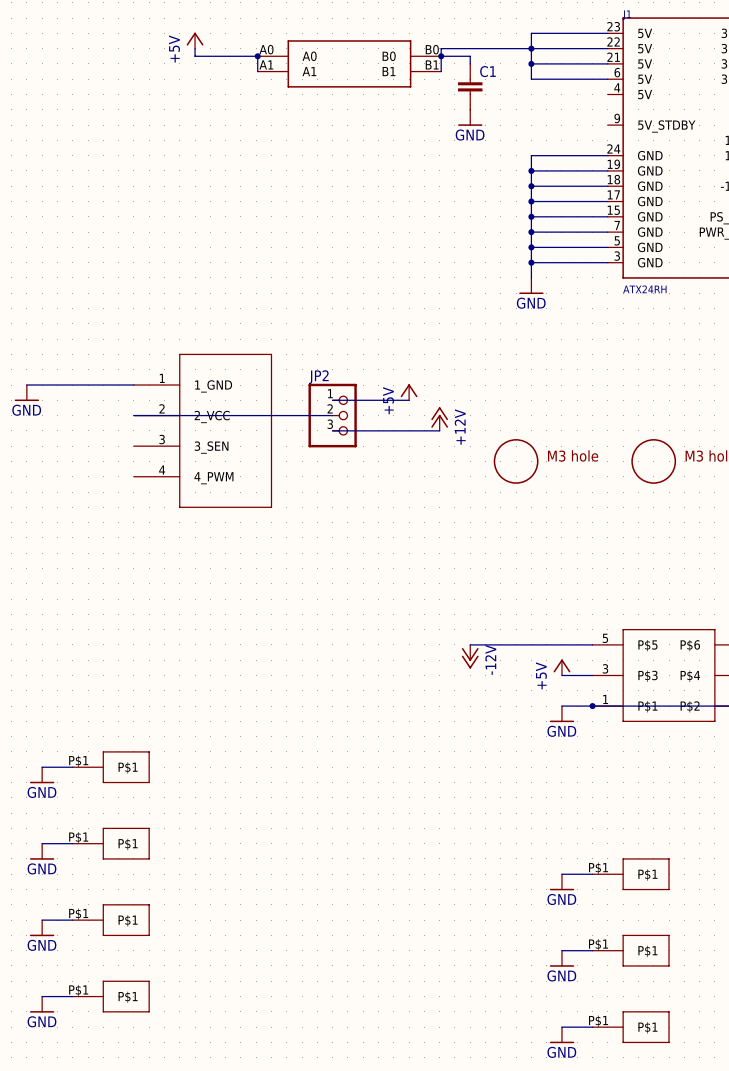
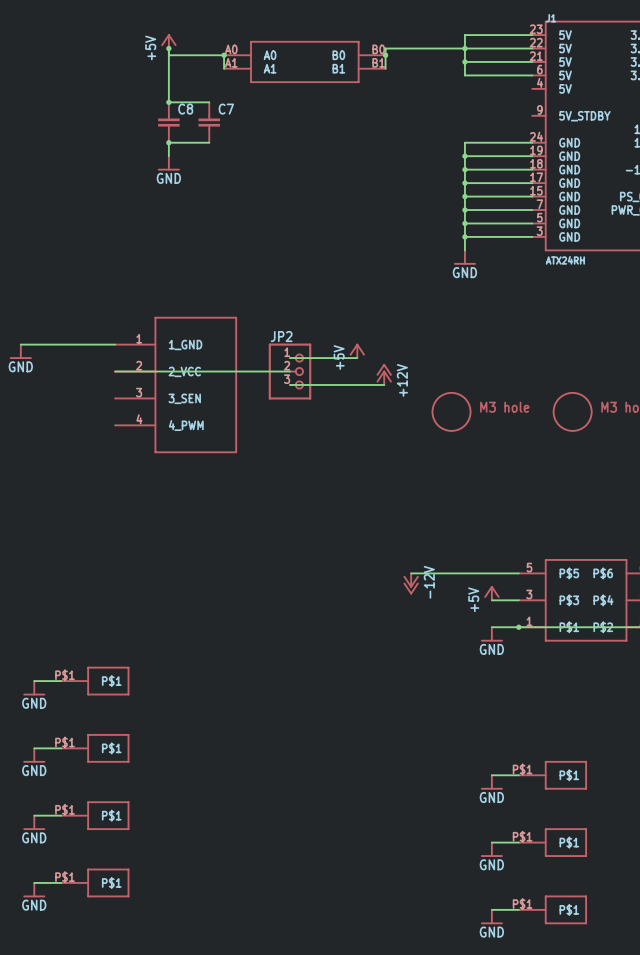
junction: none -> (168, 48)
wire: none -> (168, 55) (168, 102) (209, 102)
wire: (441, 56) (470, 56) (470, 63) -> none
C1: (470, 86) -> none
junction: none -> (168, 102)
power symbol: GND (470, 117) -> none
C8: none -> (168, 122)
C7: none -> (209, 122)
junction: none -> (168, 142)
wire: none -> (209, 142) (168, 142) (168, 156)
power symbol: none -> GND (168, 163)

